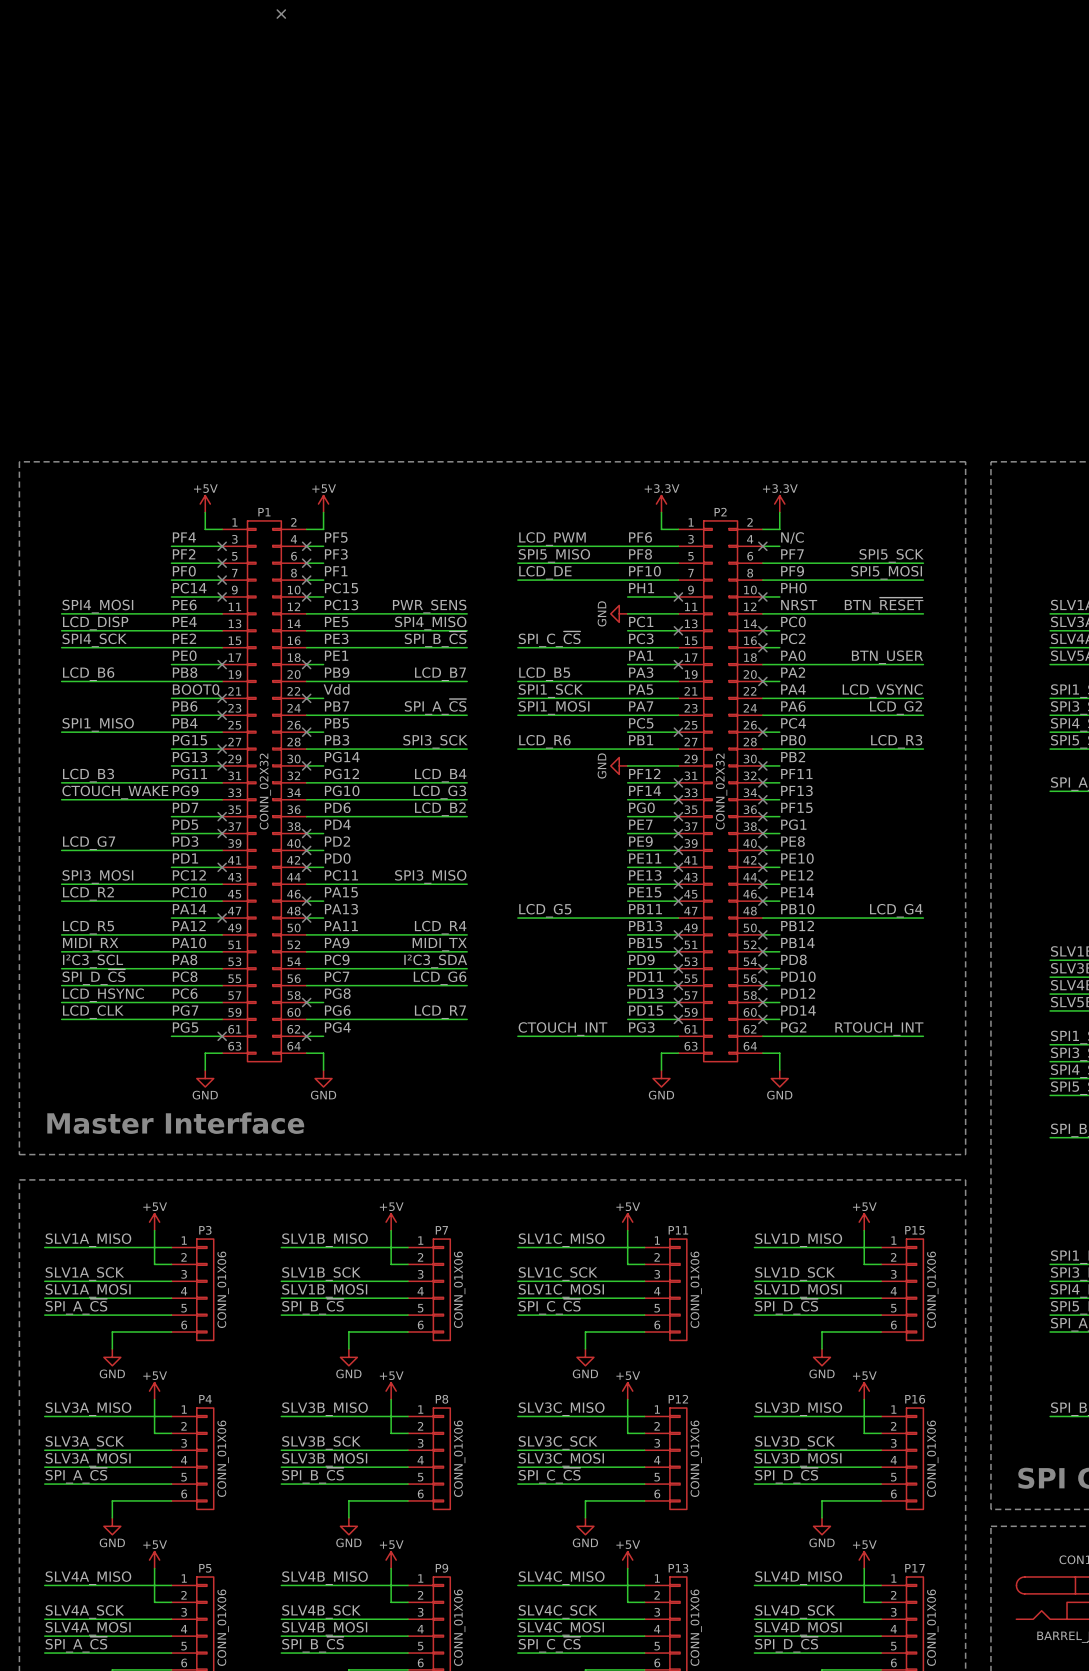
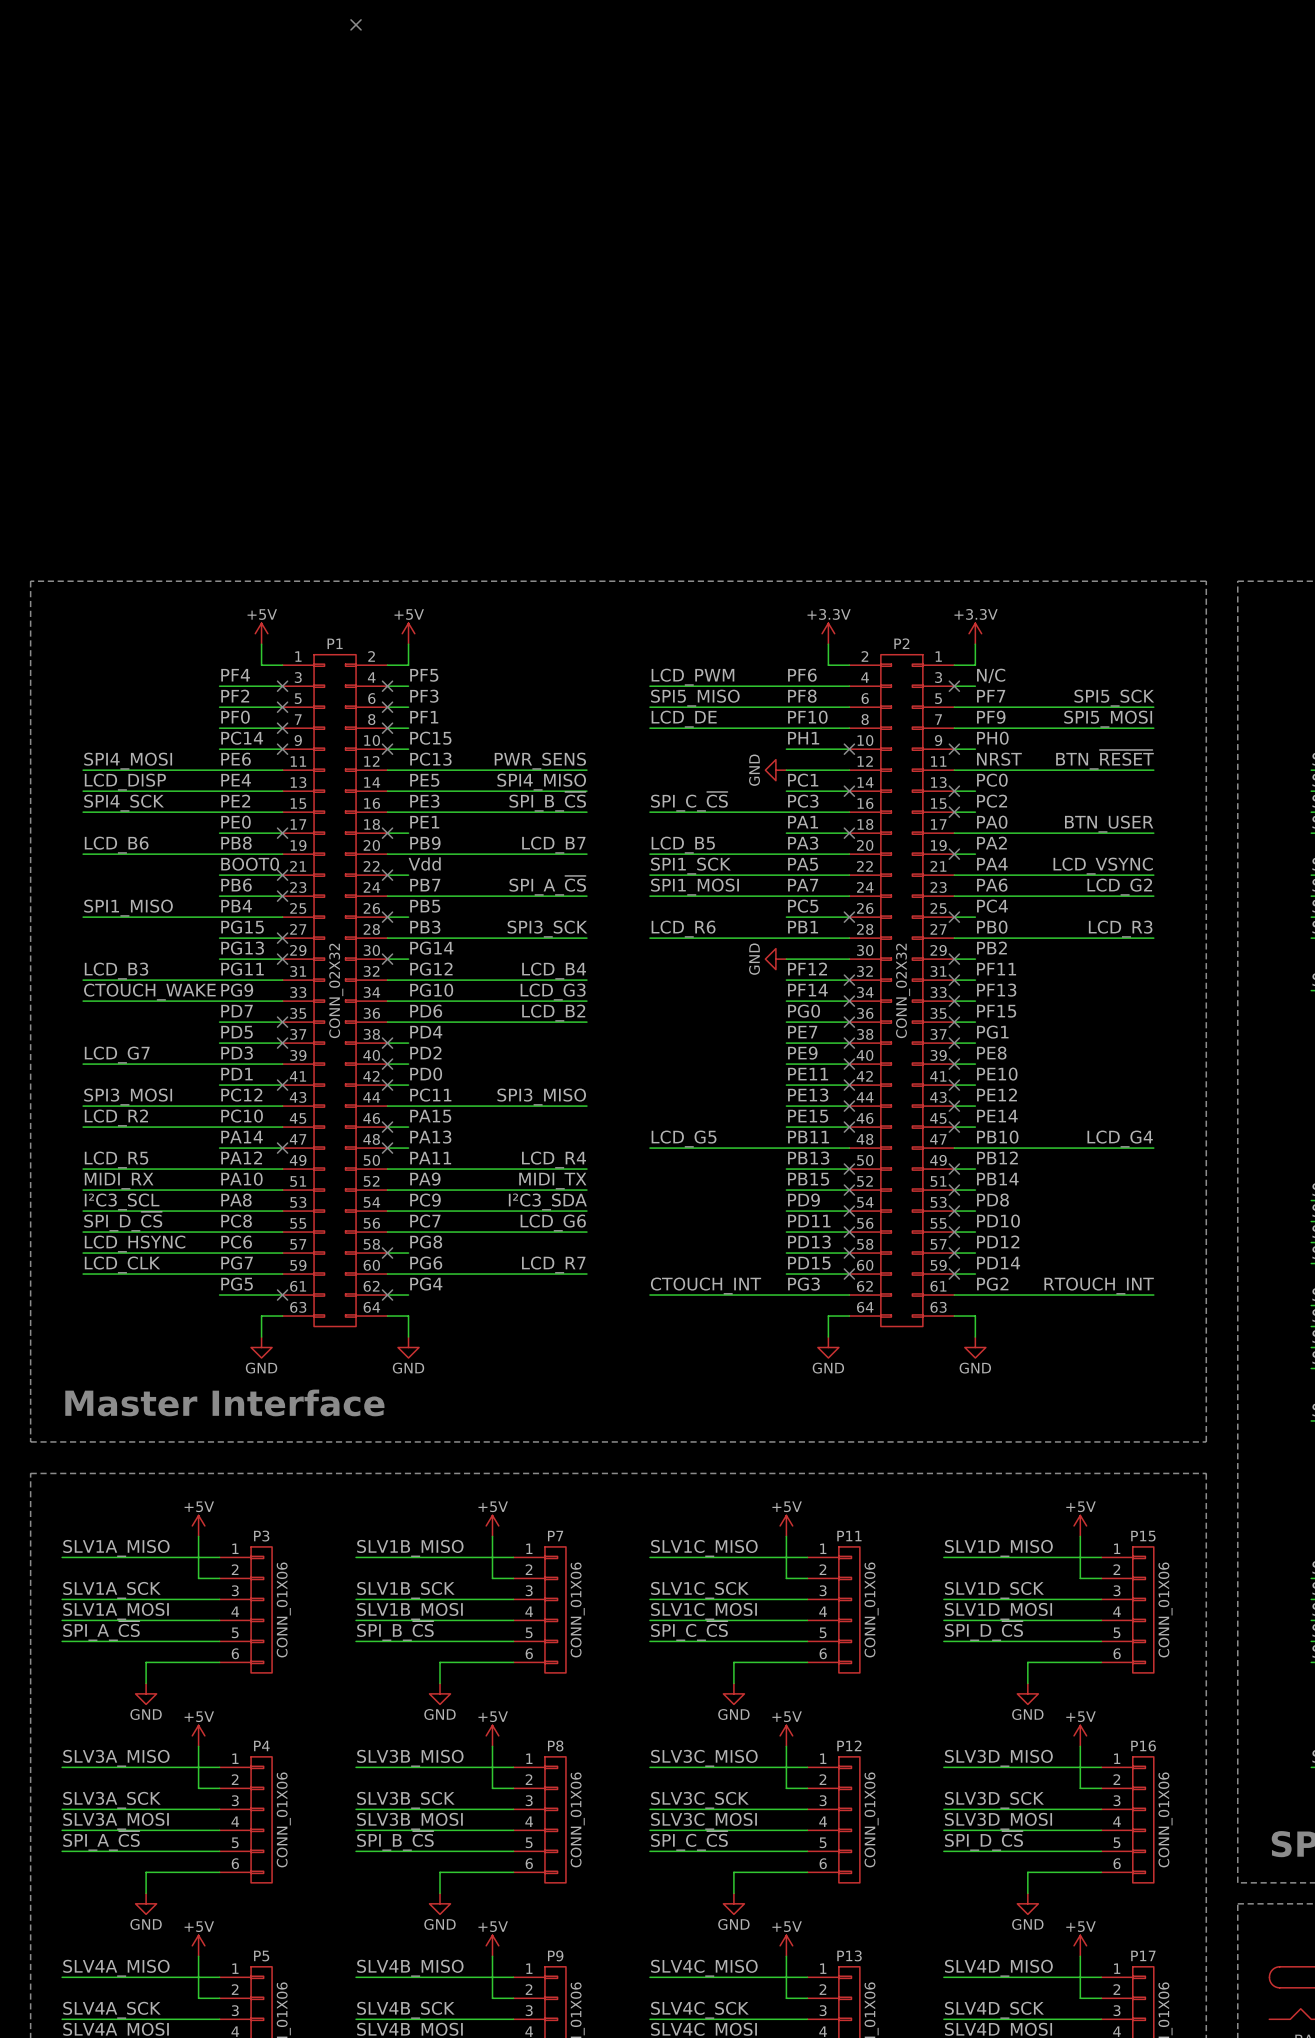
P2 flip: as is (720, 791) -> left-right (901, 990)

